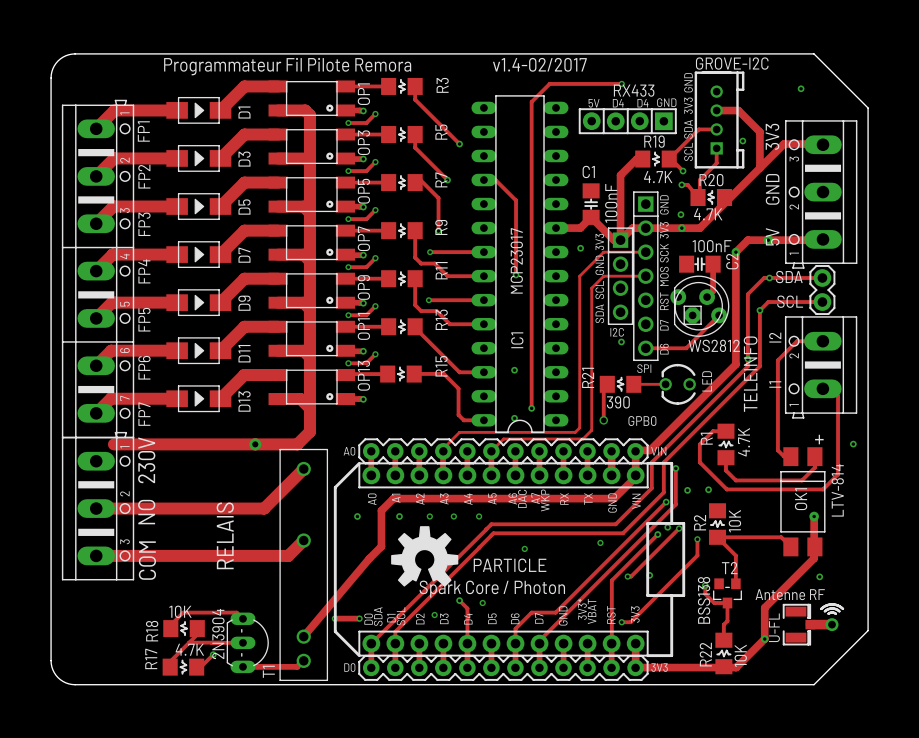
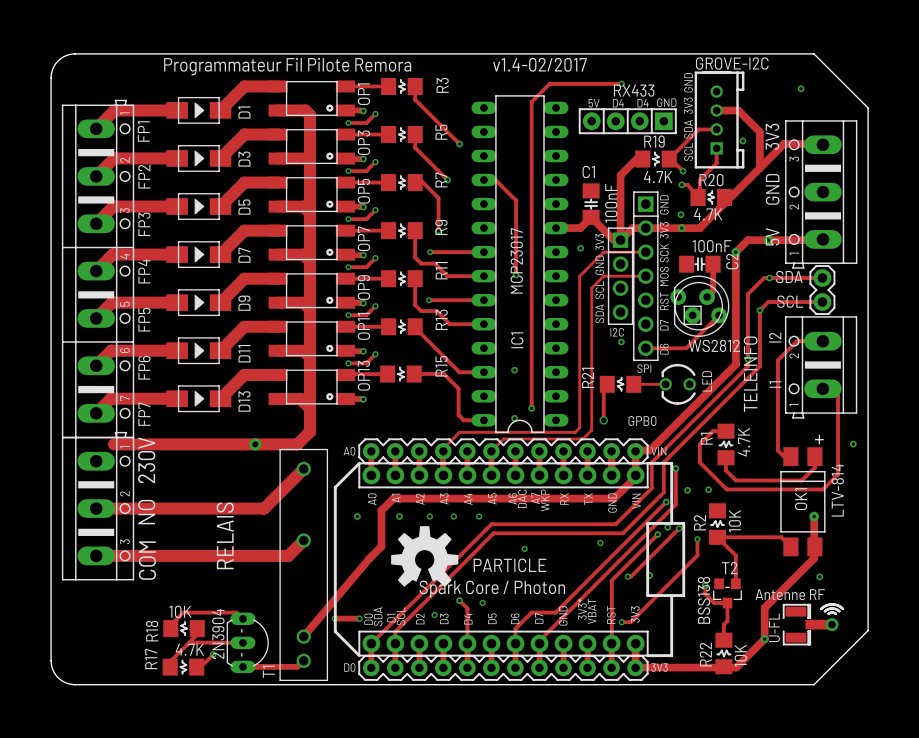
R21 value: 390 (618, 402) -> none

